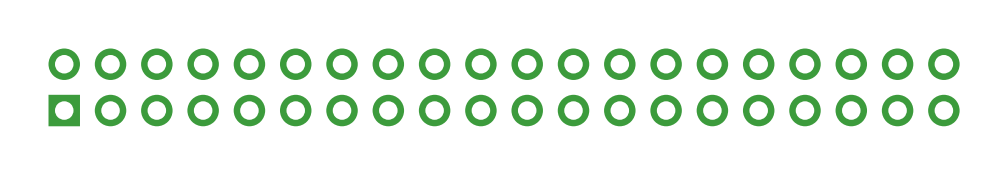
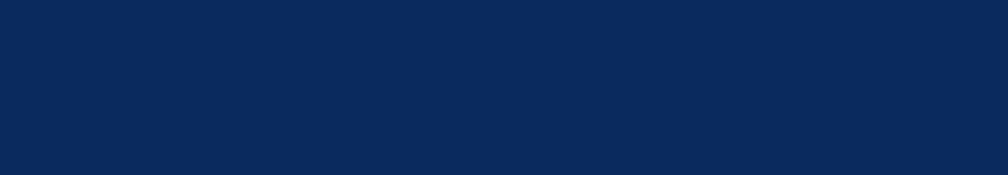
part: (504, 87) -> none

